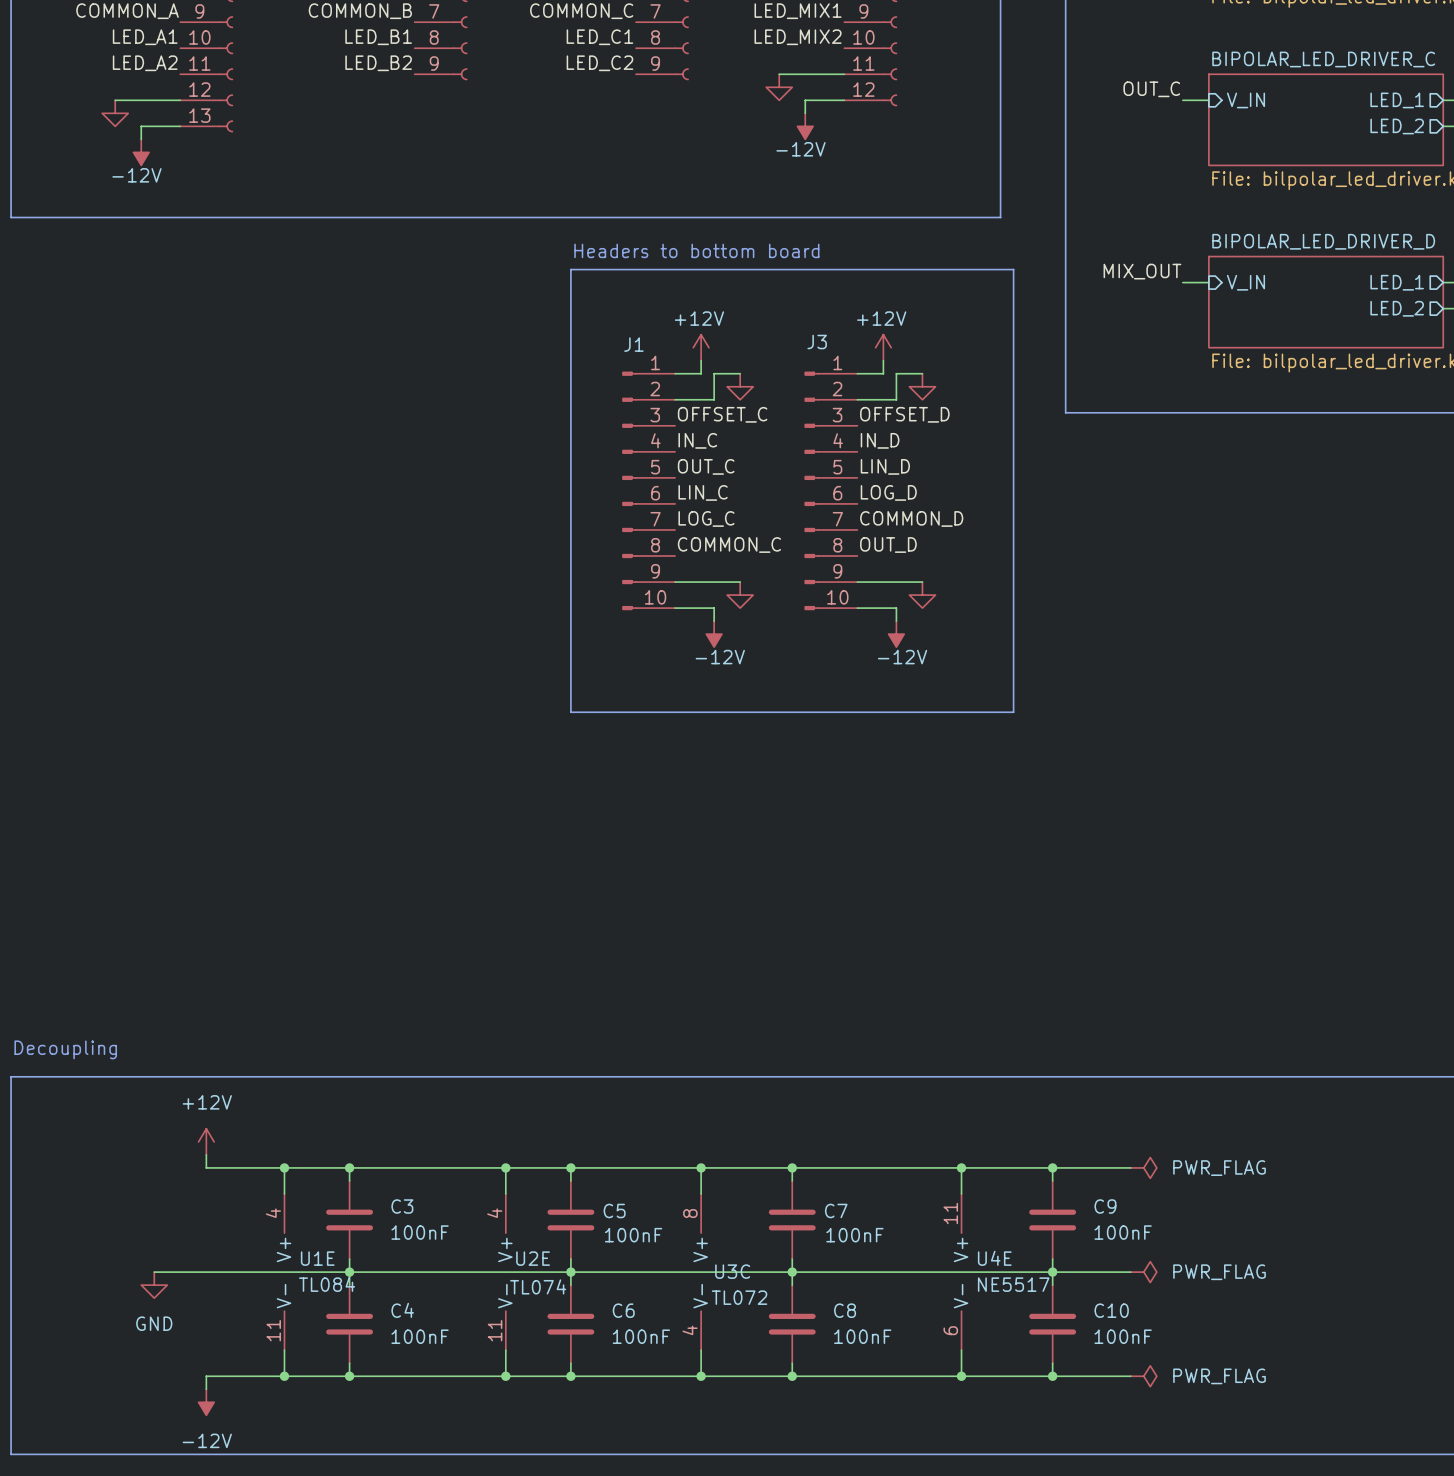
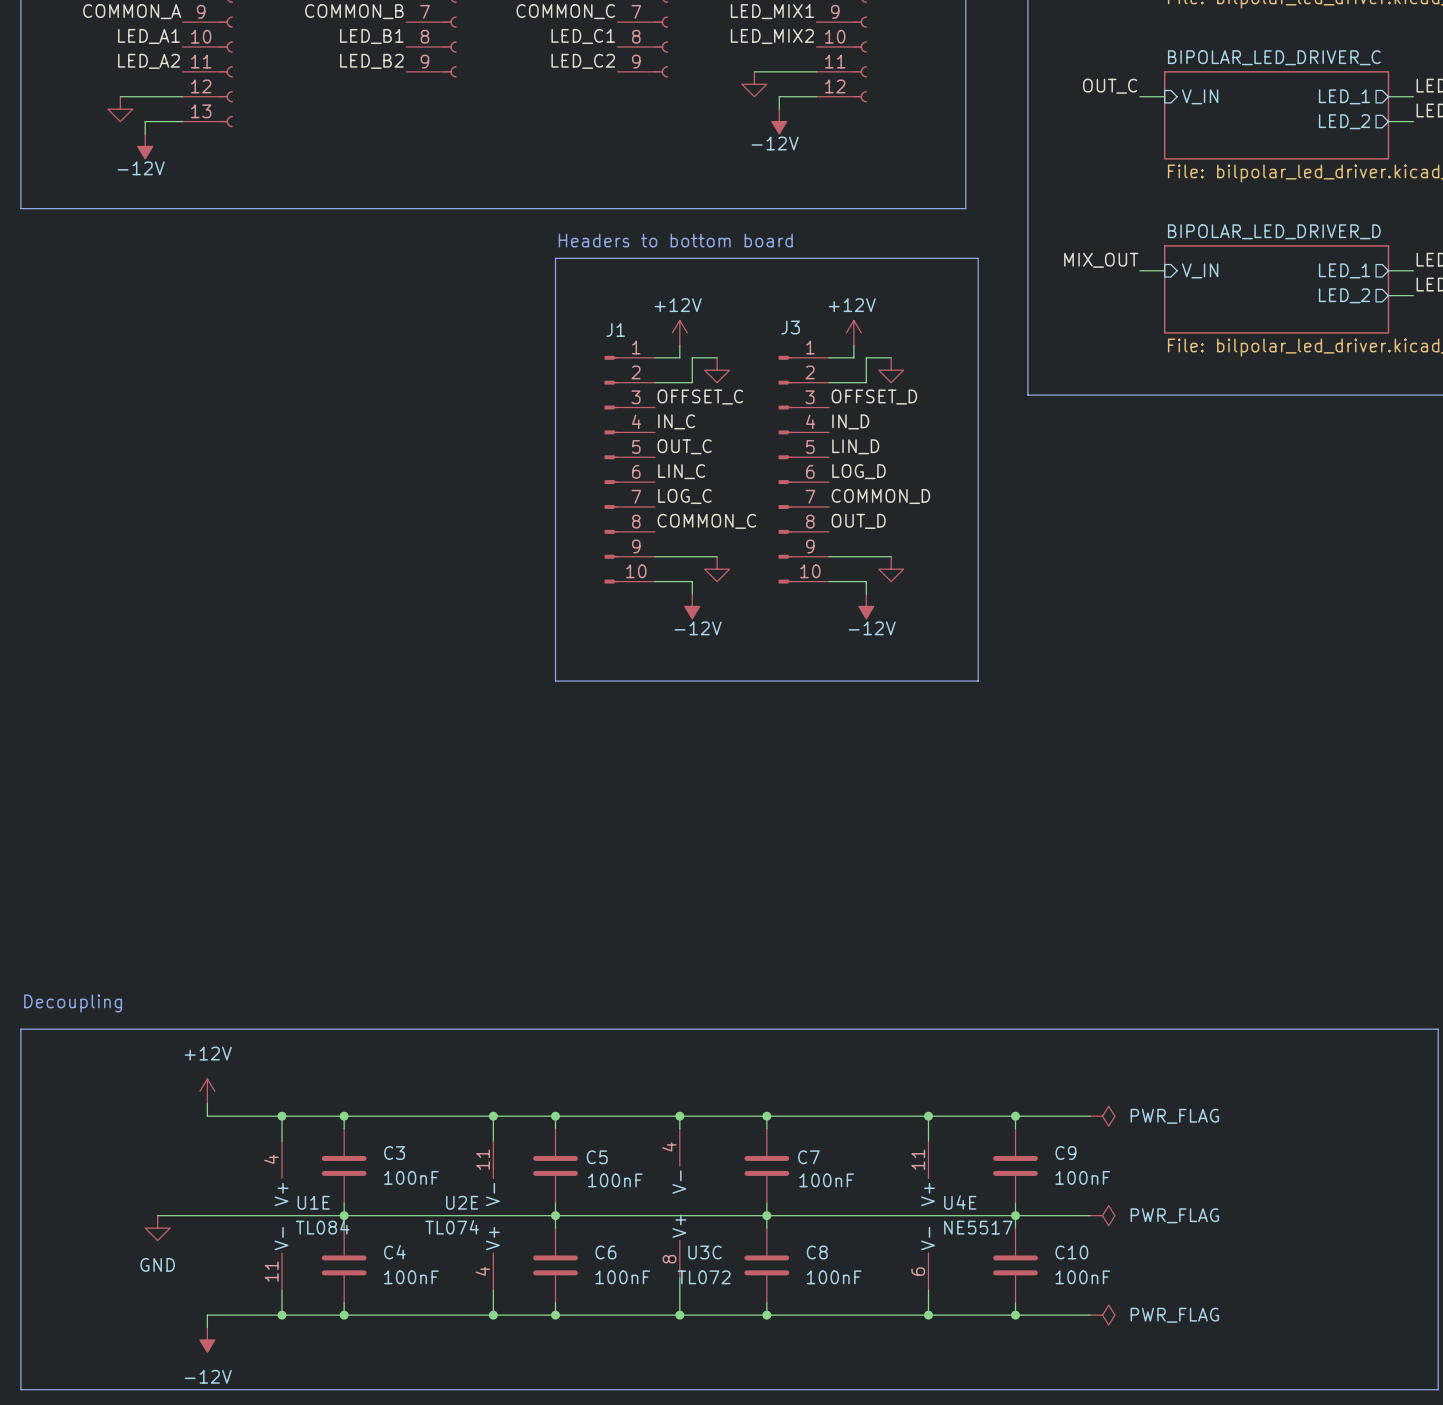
U2E name position: U2E (533, 1258) -> U2E (462, 1202)
U3C name position: U3C (732, 1271) -> U3C (704, 1252)
U2E rotation: 0° (505, 1272) -> 180° (493, 1215)
U3C rotation: 0° (701, 1272) -> 180° (679, 1203)
U2E value position: TL074 (538, 1286) -> TL074 (452, 1227)
U3C value position: TL072 (739, 1297) -> TL072 (704, 1277)

